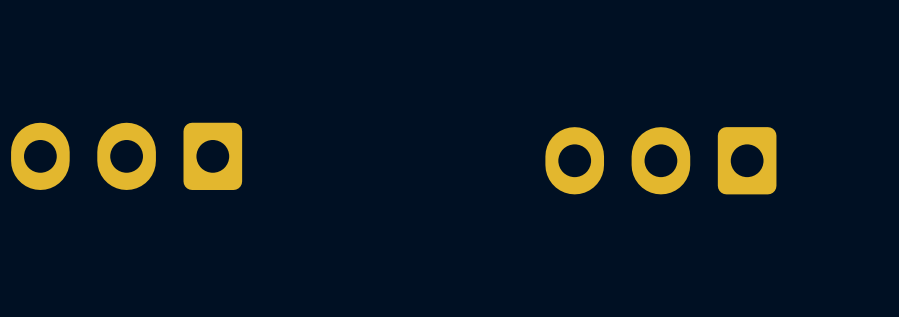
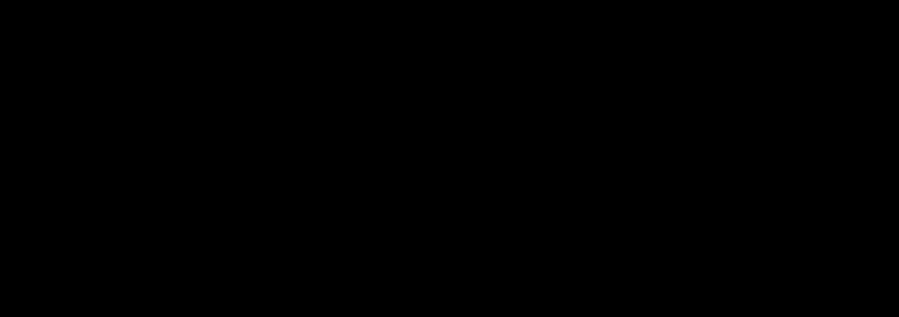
part: (126, 156) -> none
part: (660, 160) -> none

